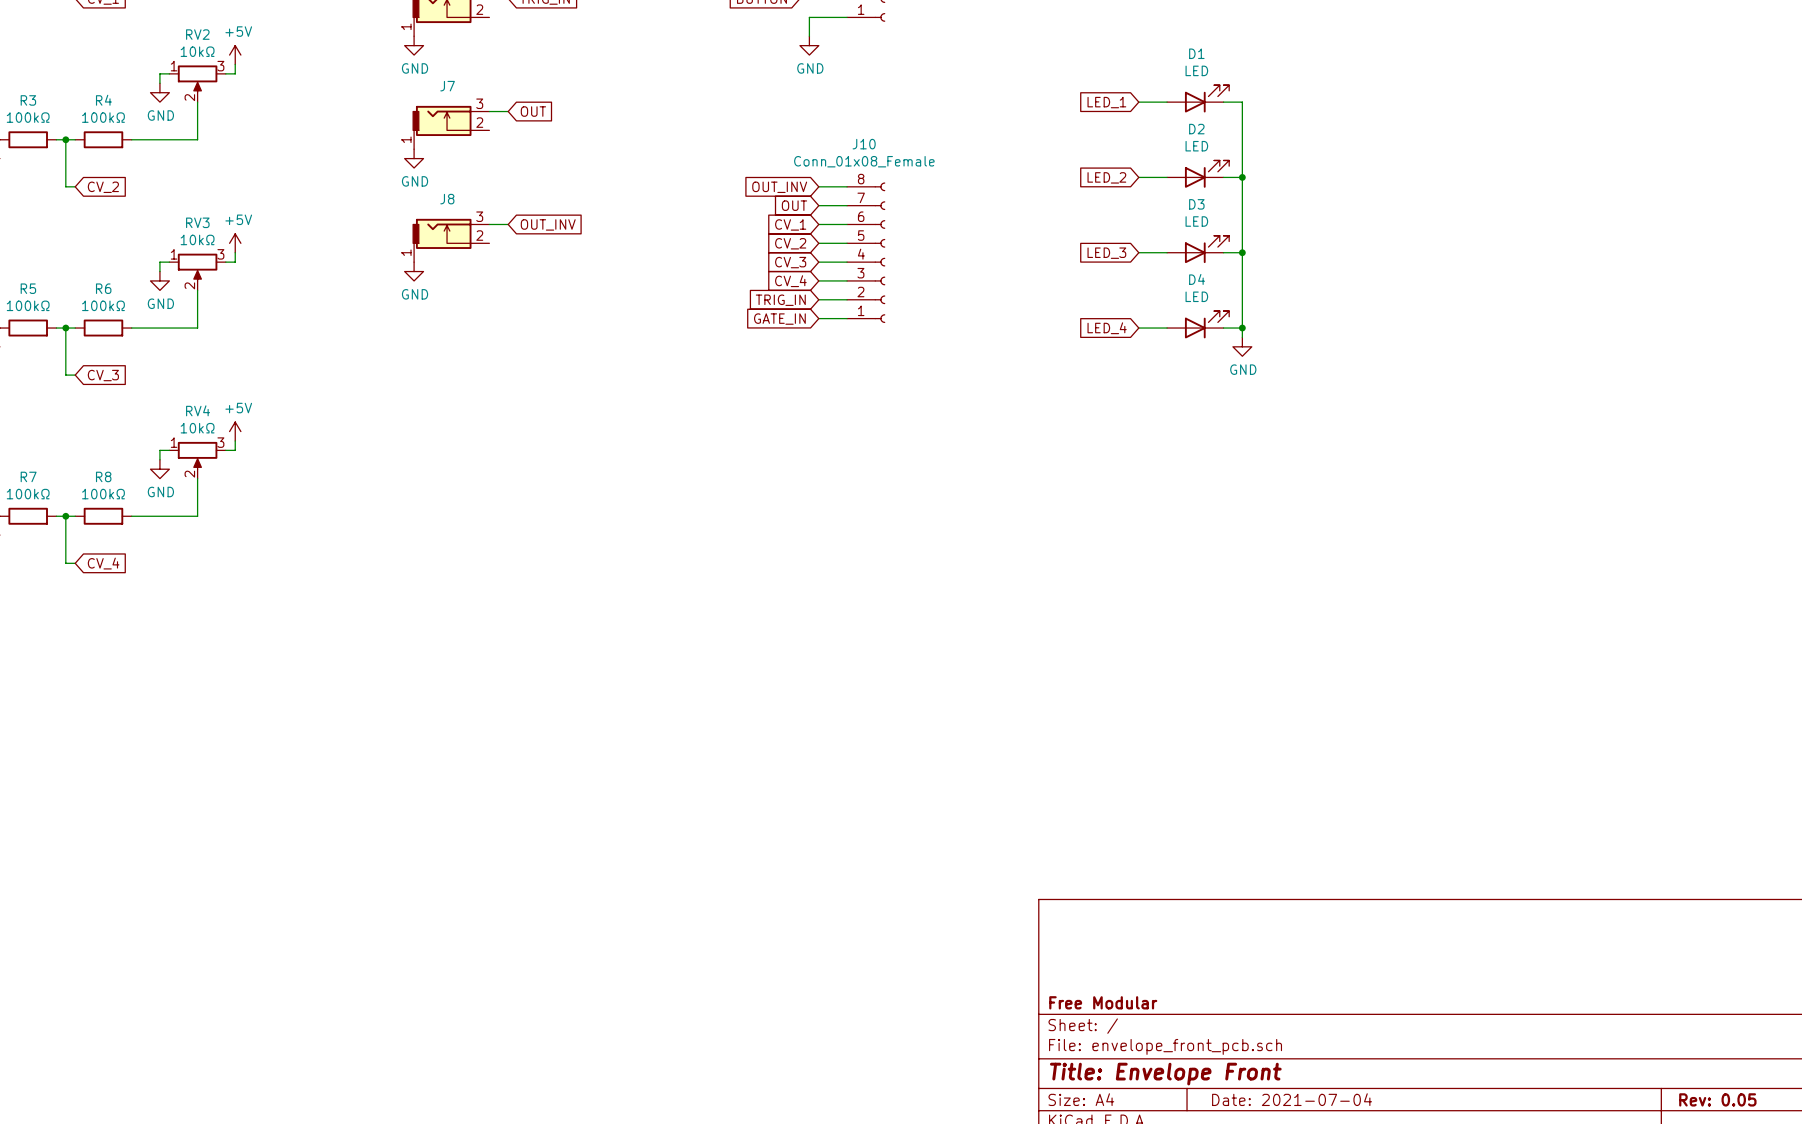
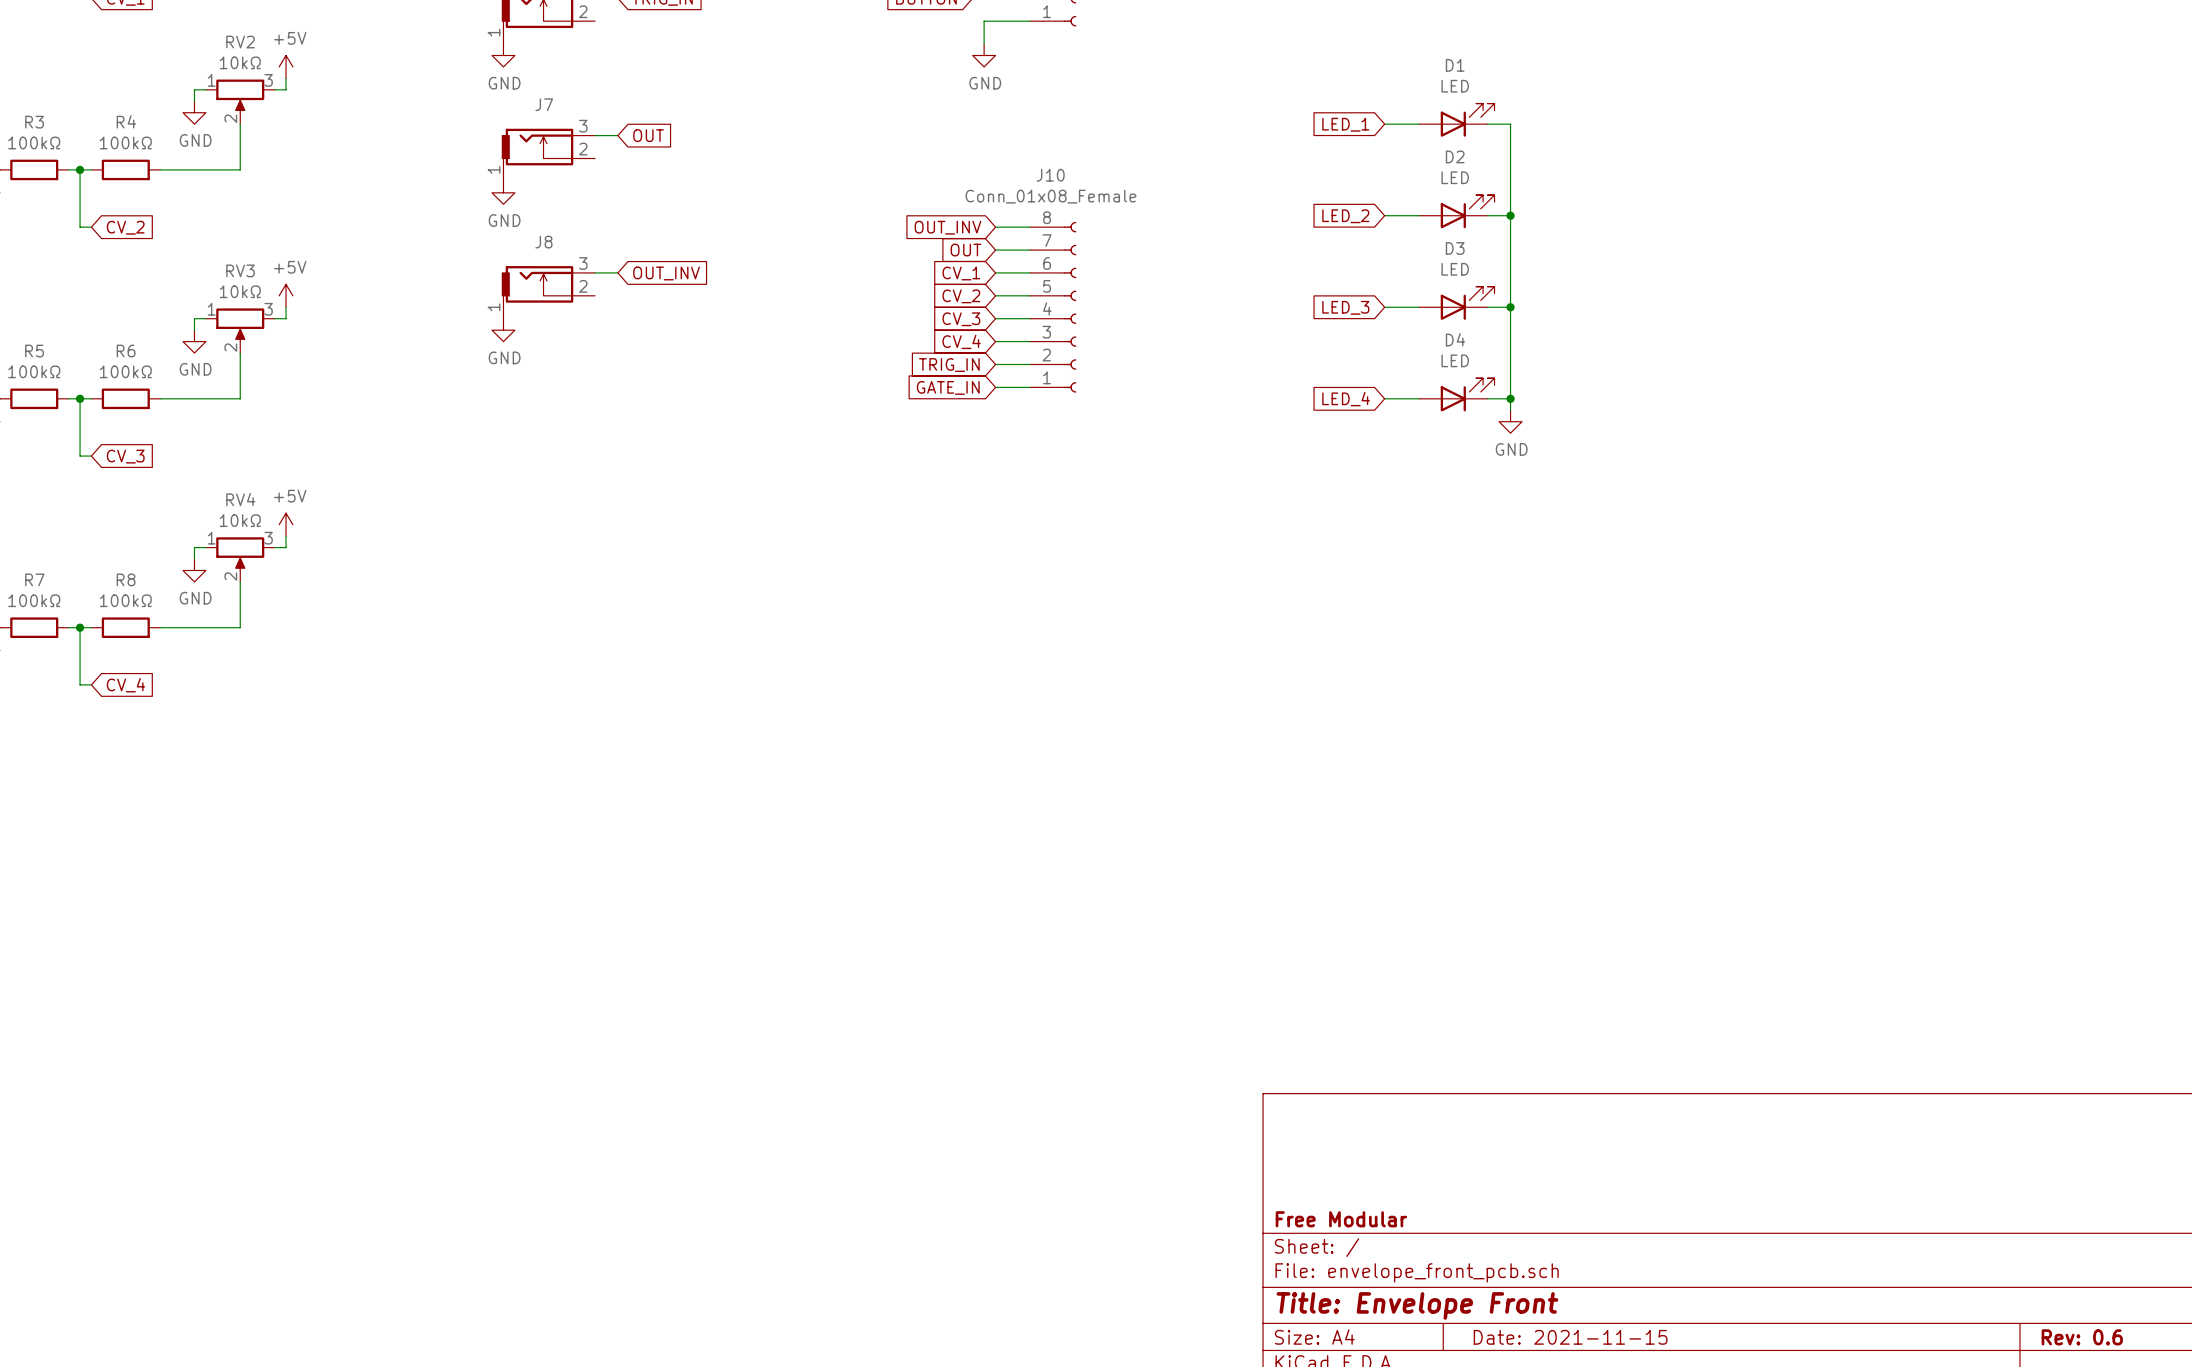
title block: Date: 2021-07-04 (1292, 1099) -> Date: 2021-11-15 (1570, 1337)
title block: Rev: 0.05 (1717, 1099) -> Rev: 0.6 (2082, 1337)

